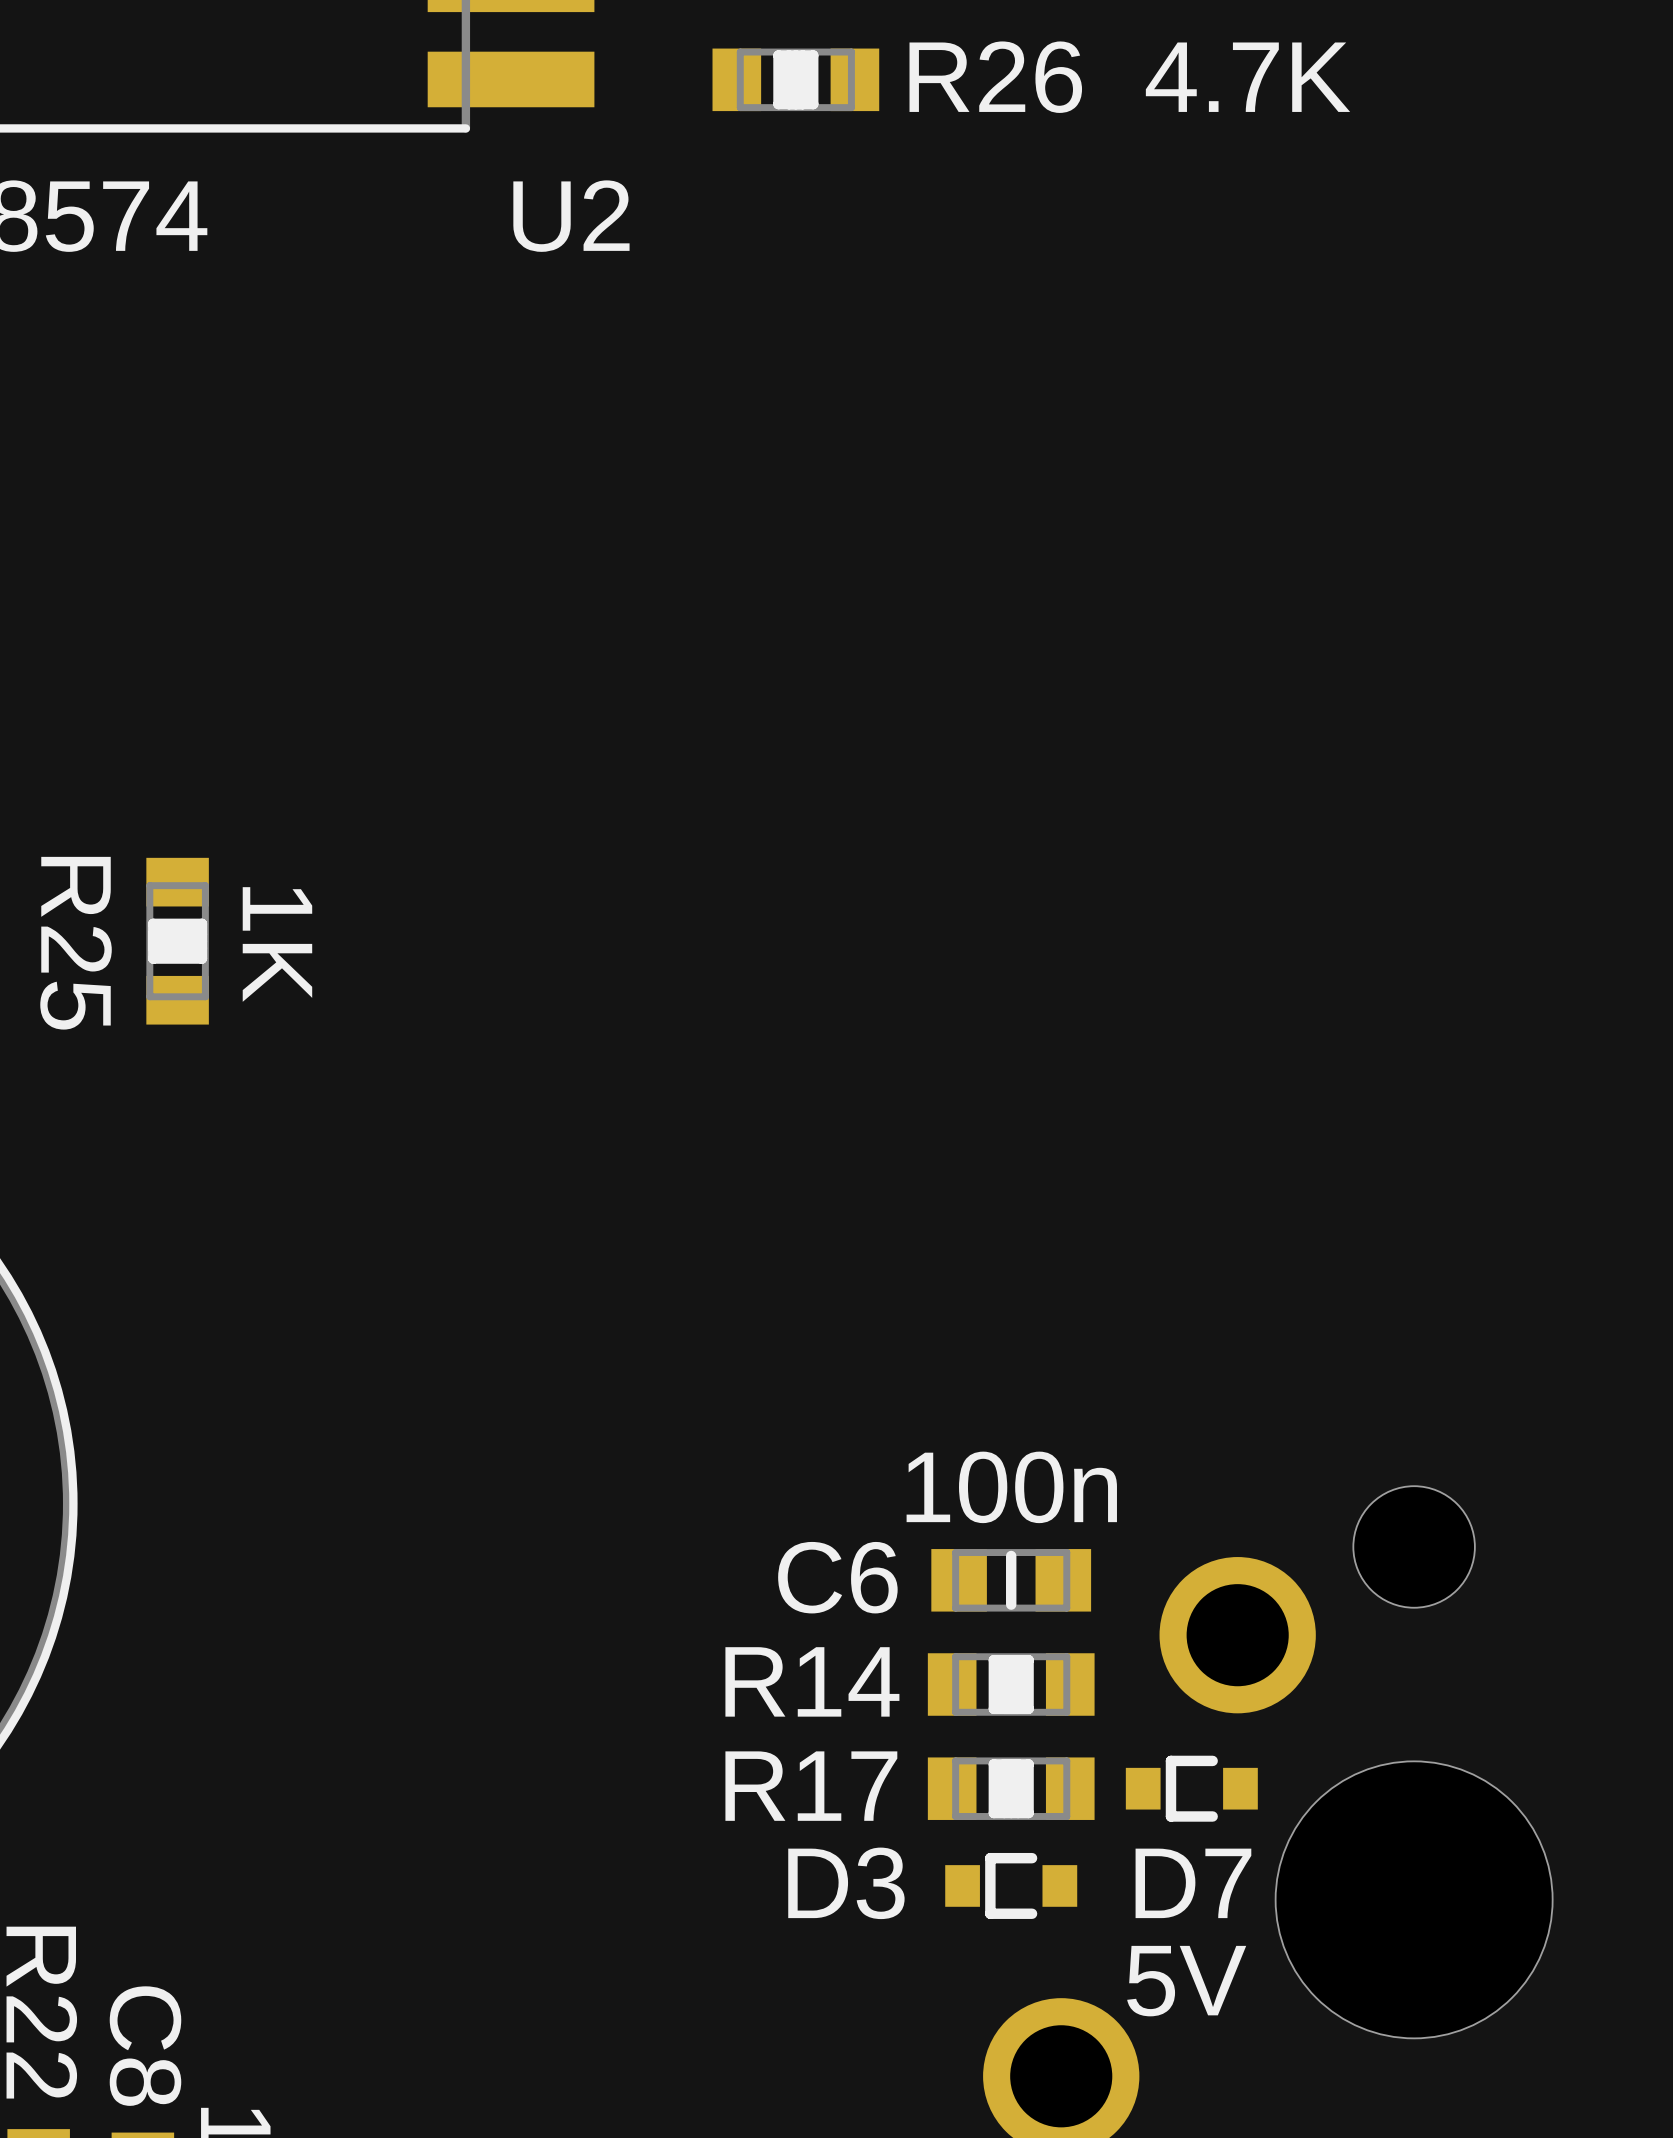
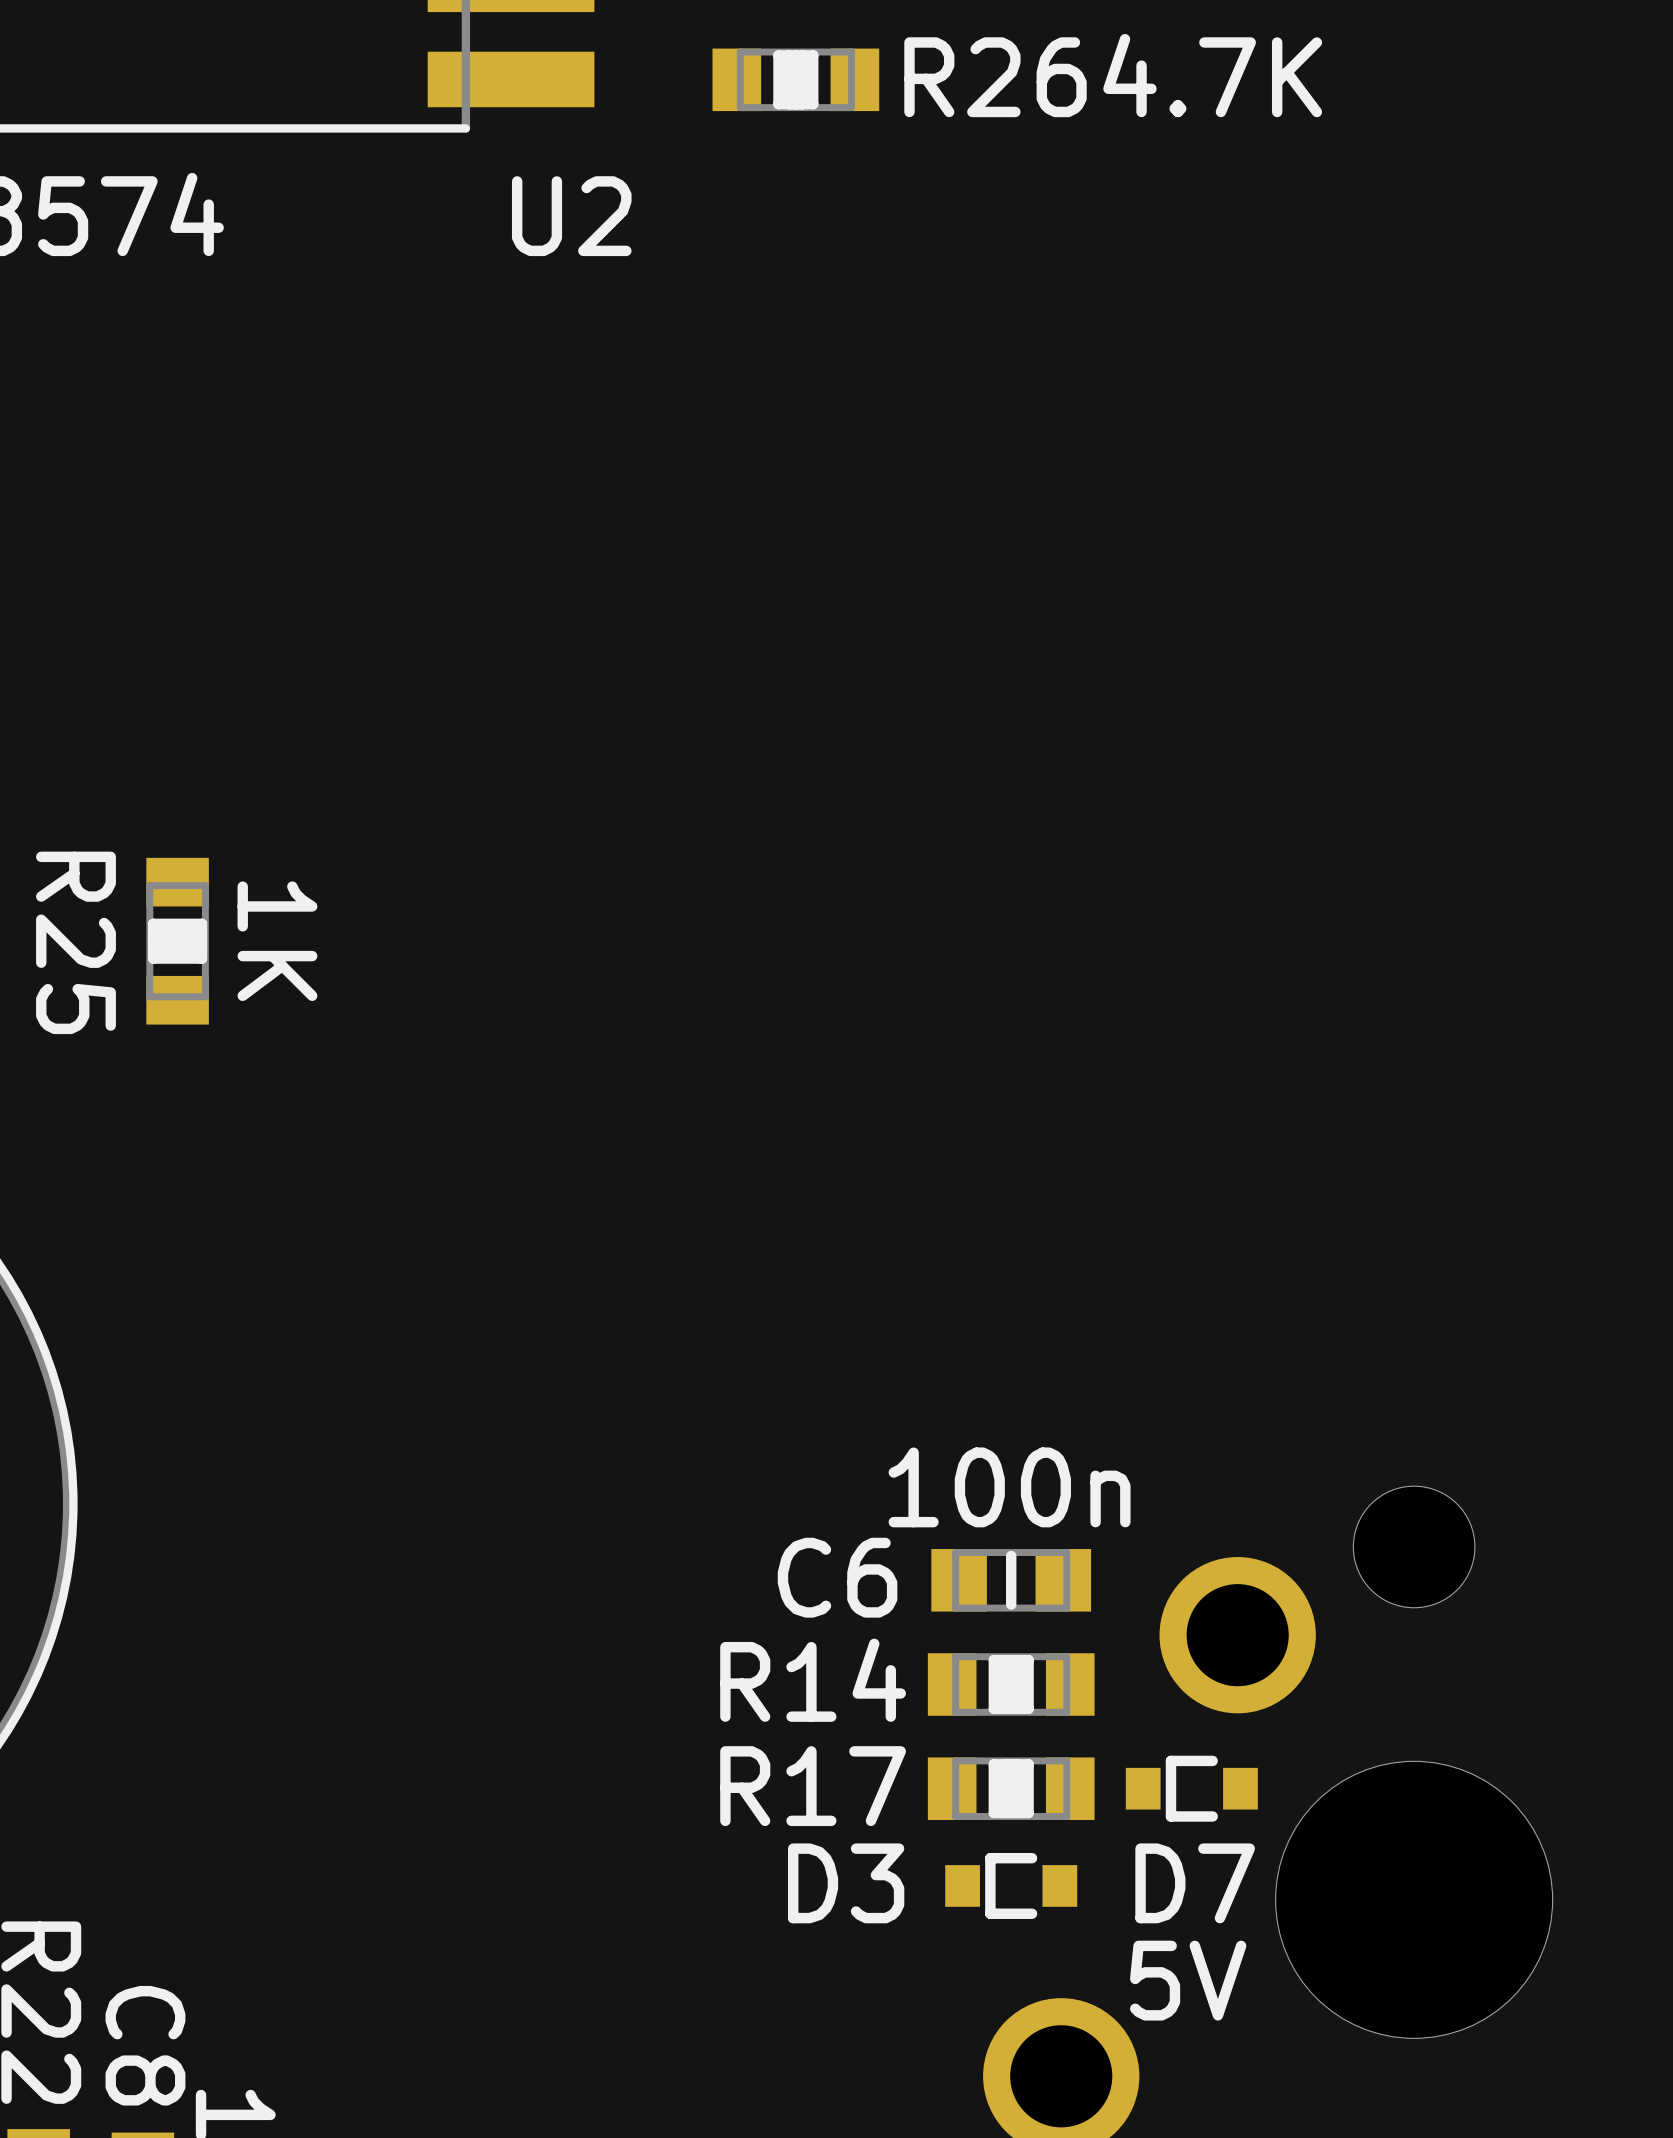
R26 value position: 4.7K (1247, 77) -> 4.7K (1212, 75)

